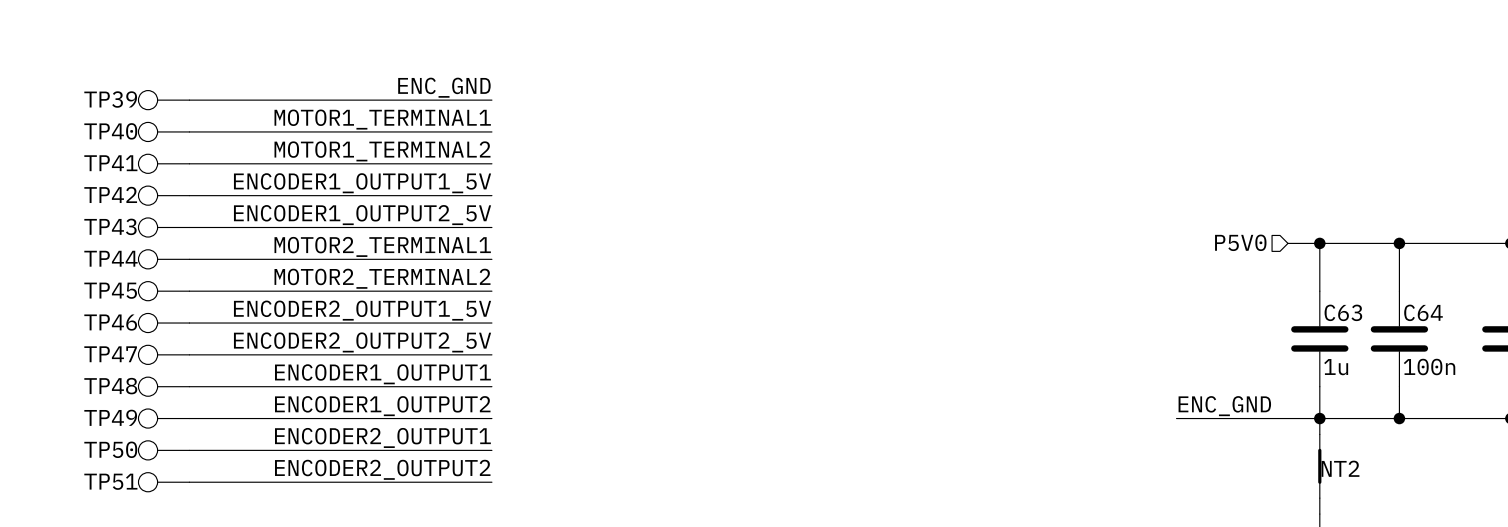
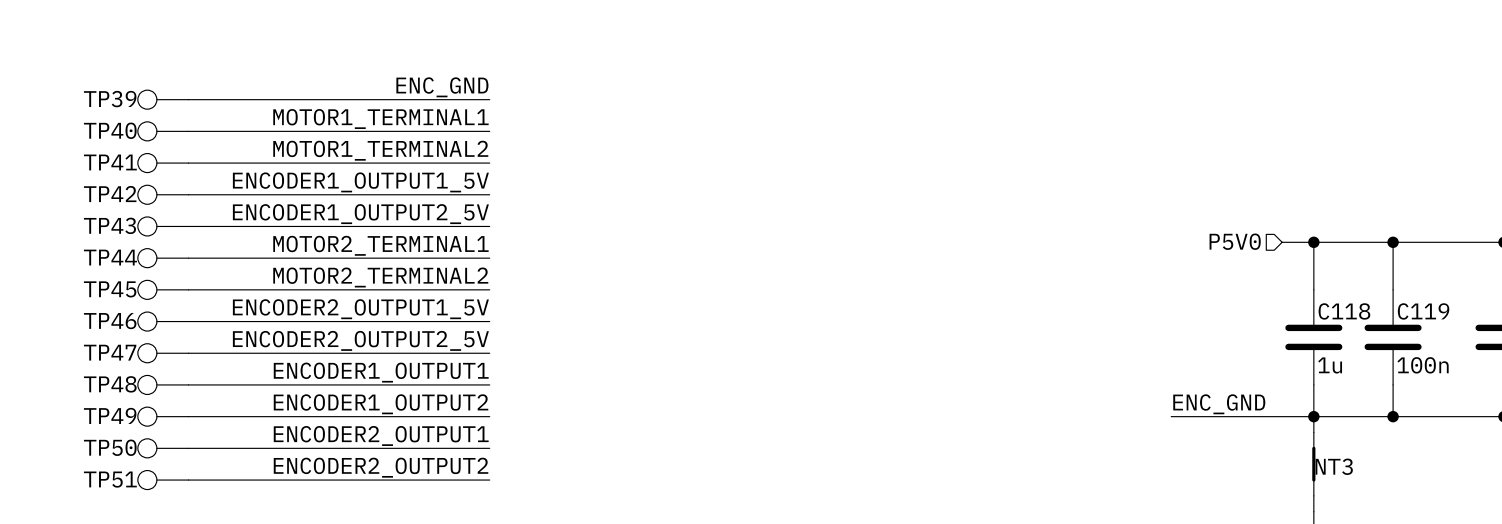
C63 name: C63 (1343, 312) -> C118 (1344, 311)
C64 name: C64 (1423, 312) -> C119 (1423, 311)
NT2 name: NT2 (1340, 468) -> NT3 (1334, 466)

